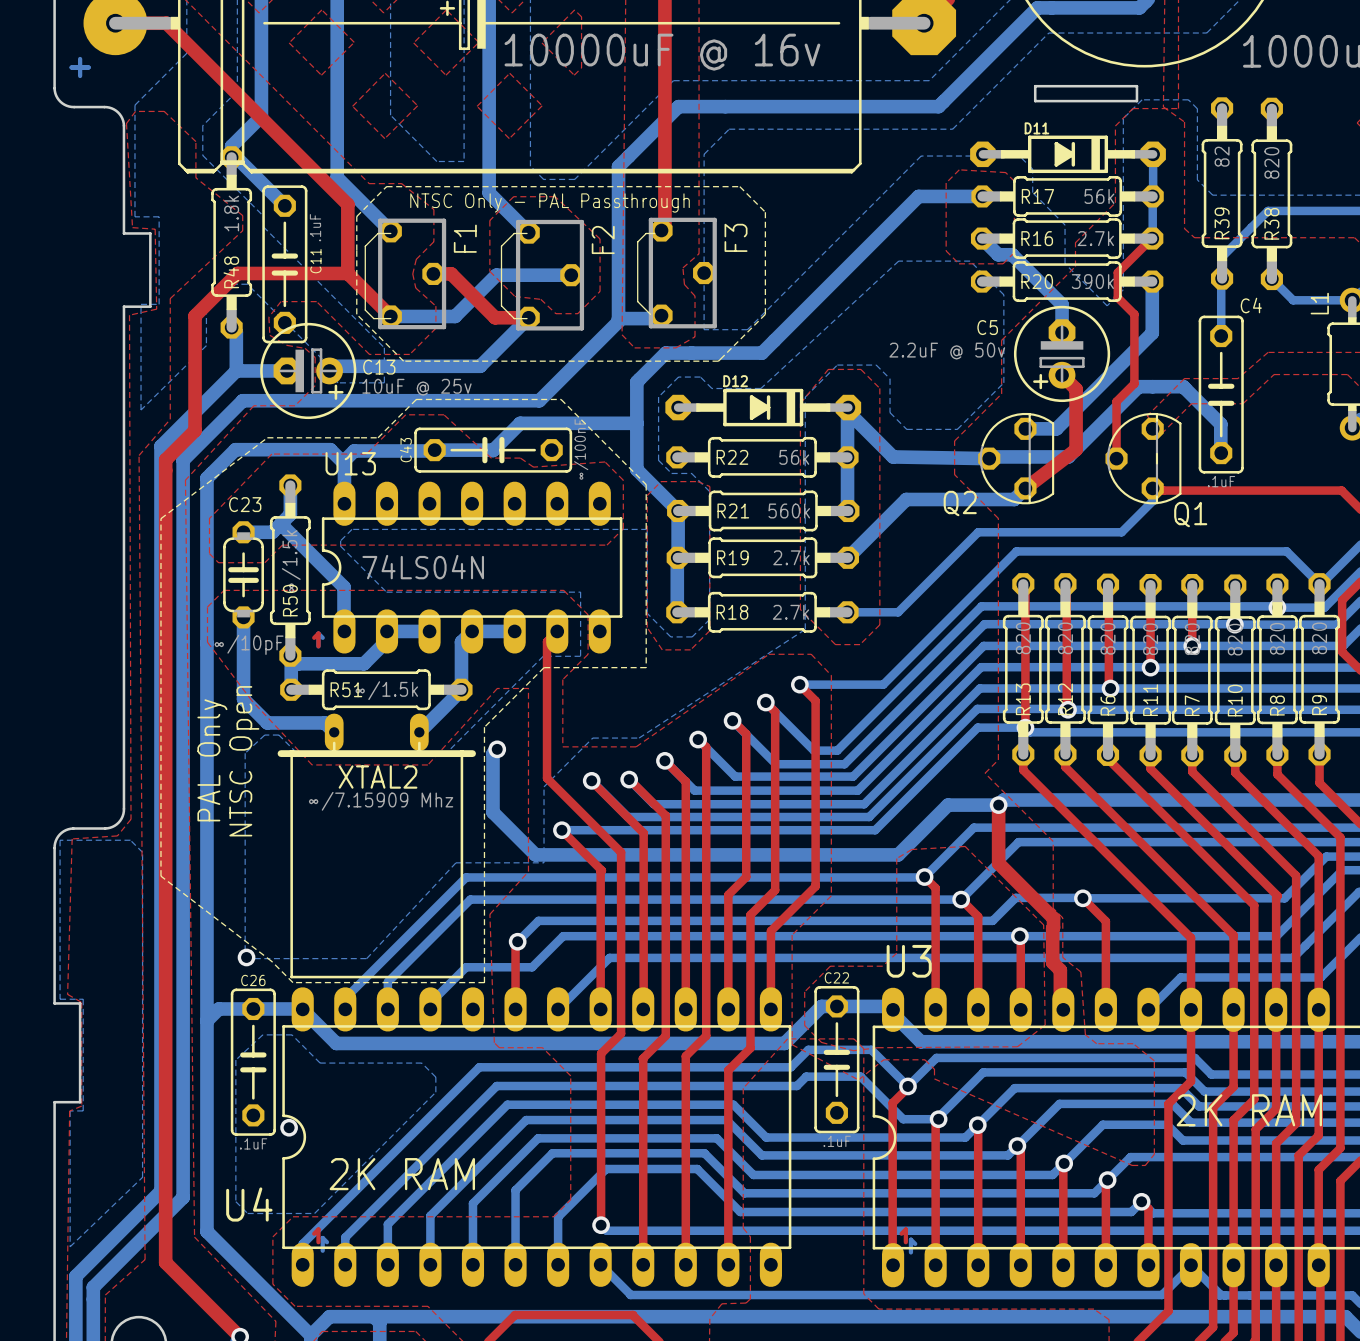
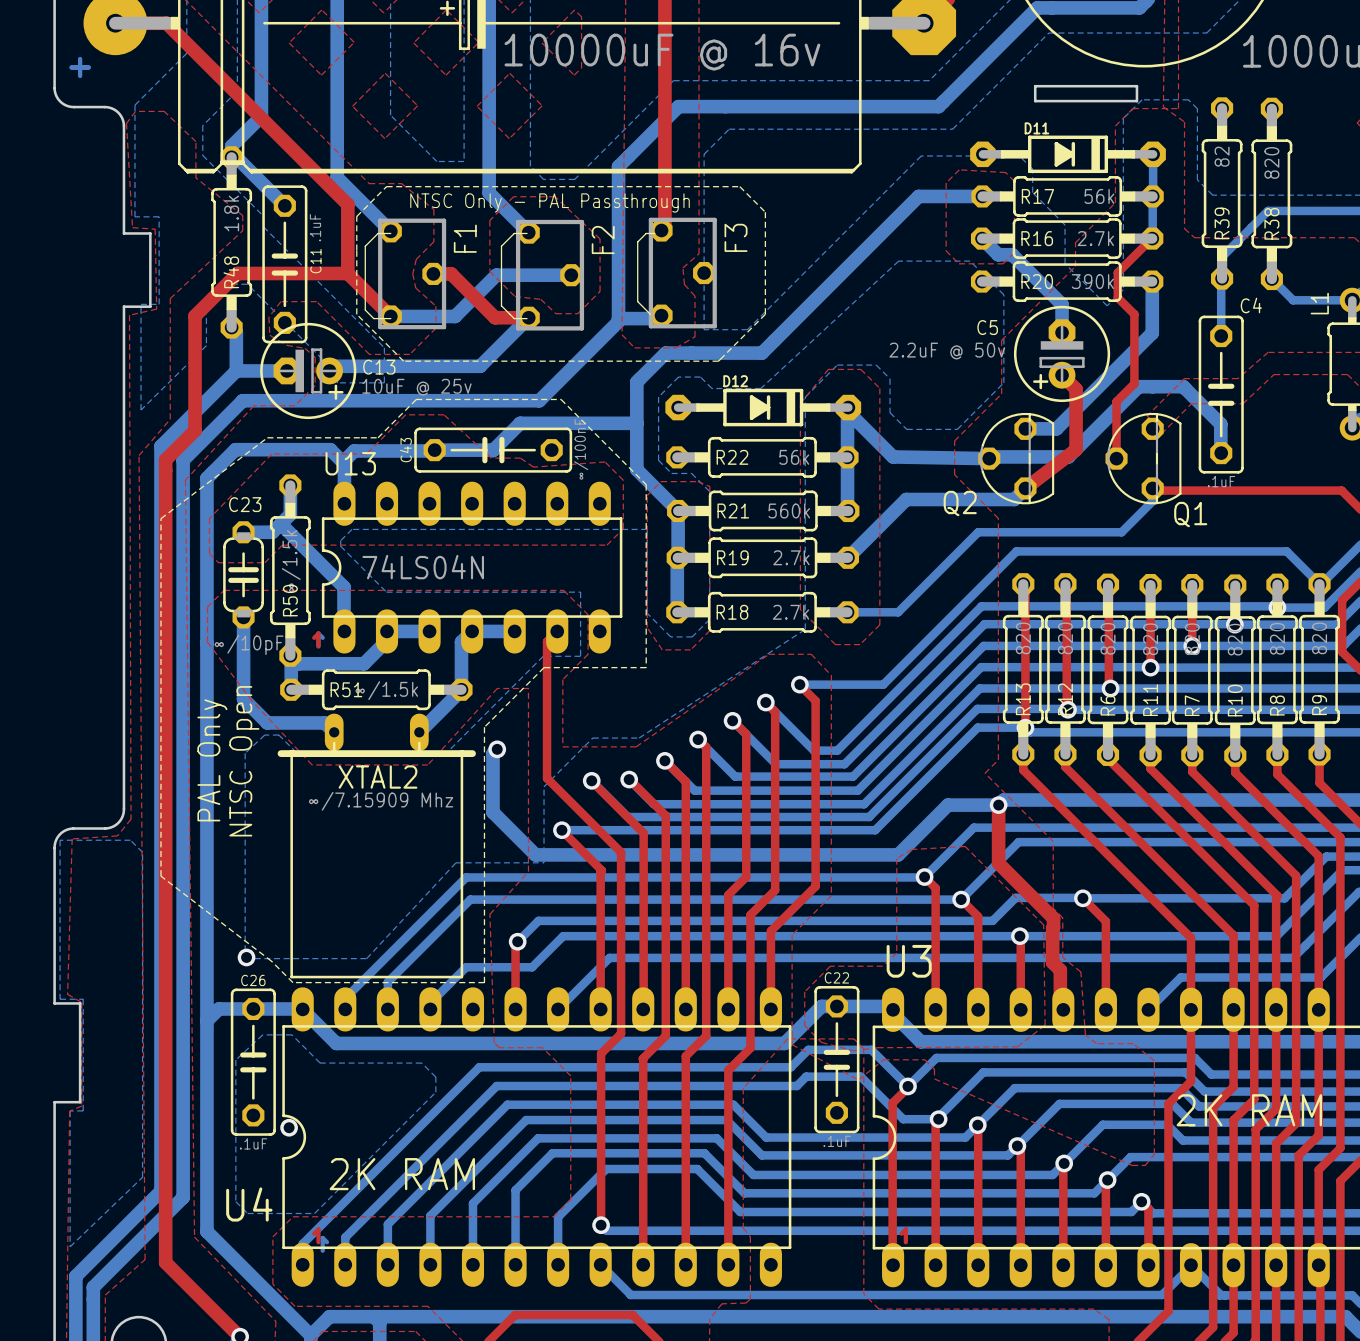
bottom track: (915, 1243) (910, 1239) (910, 1252) -> none

